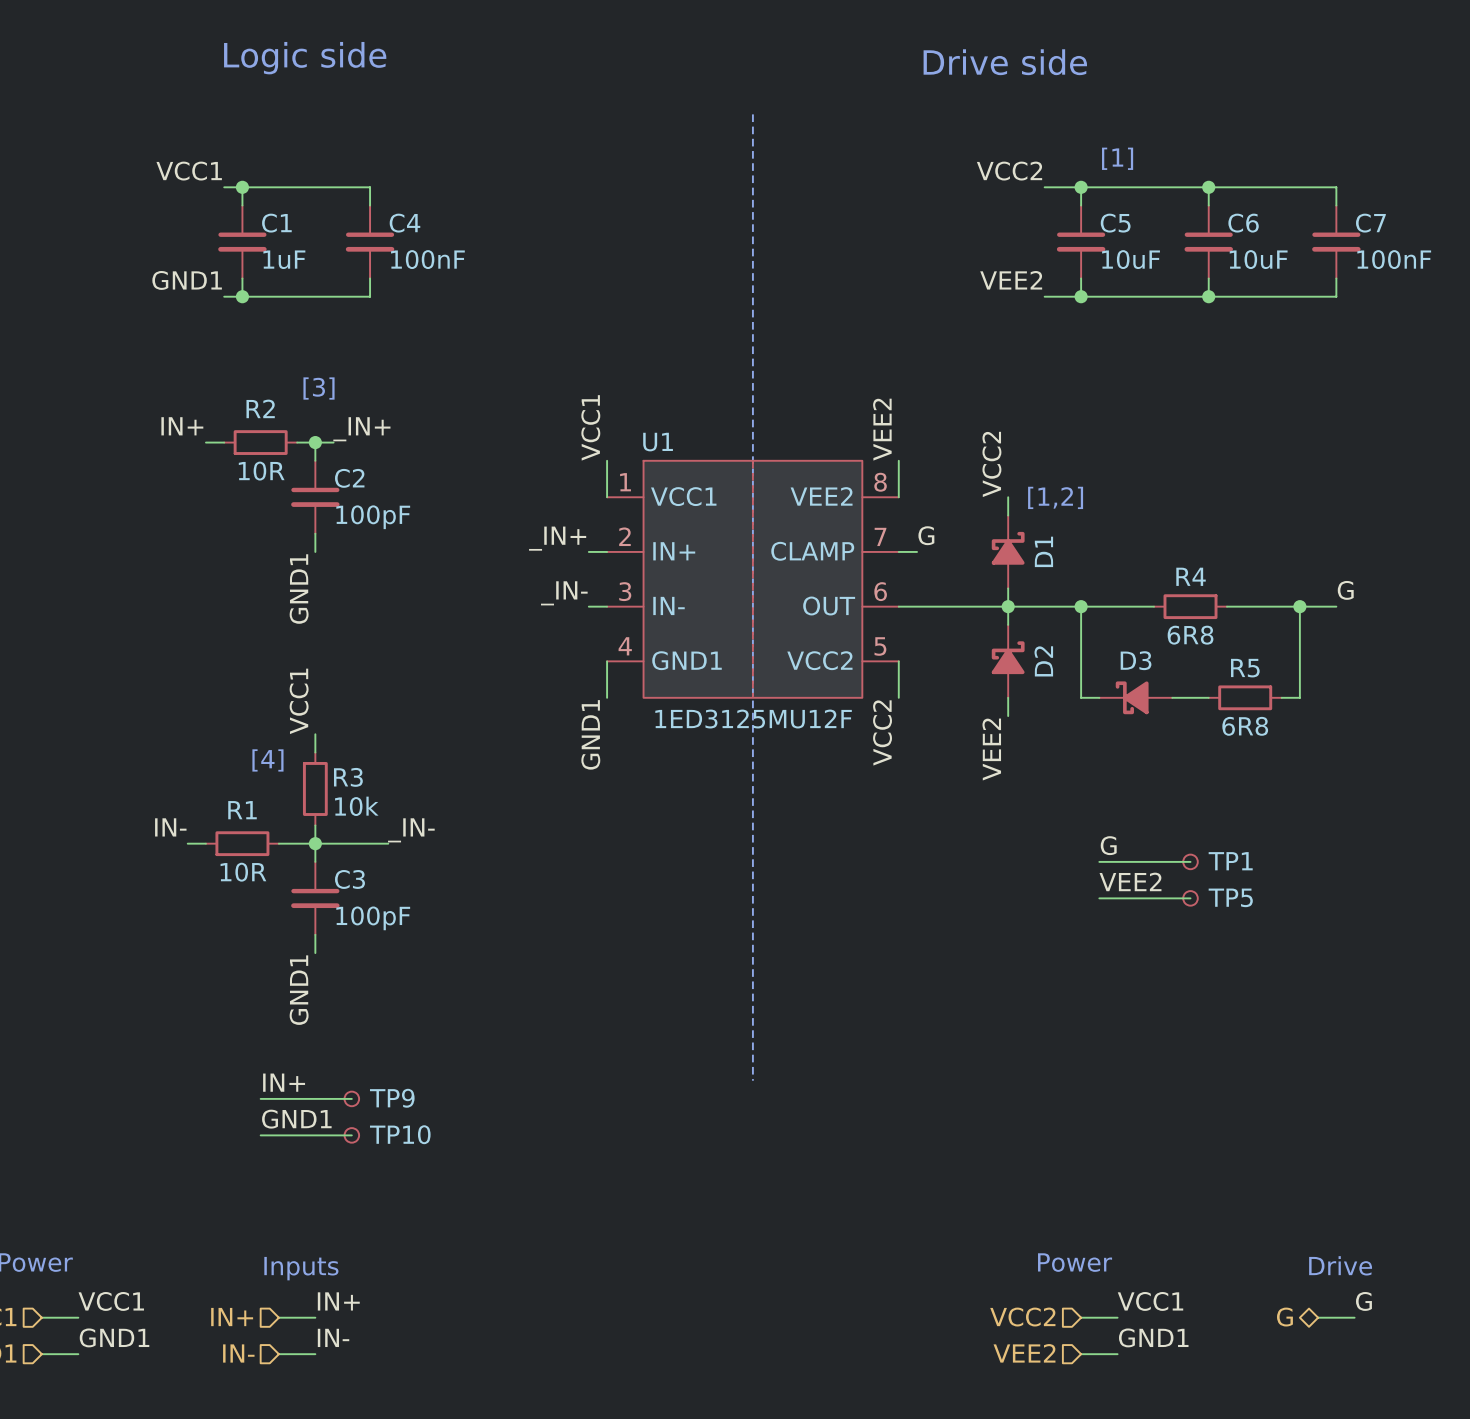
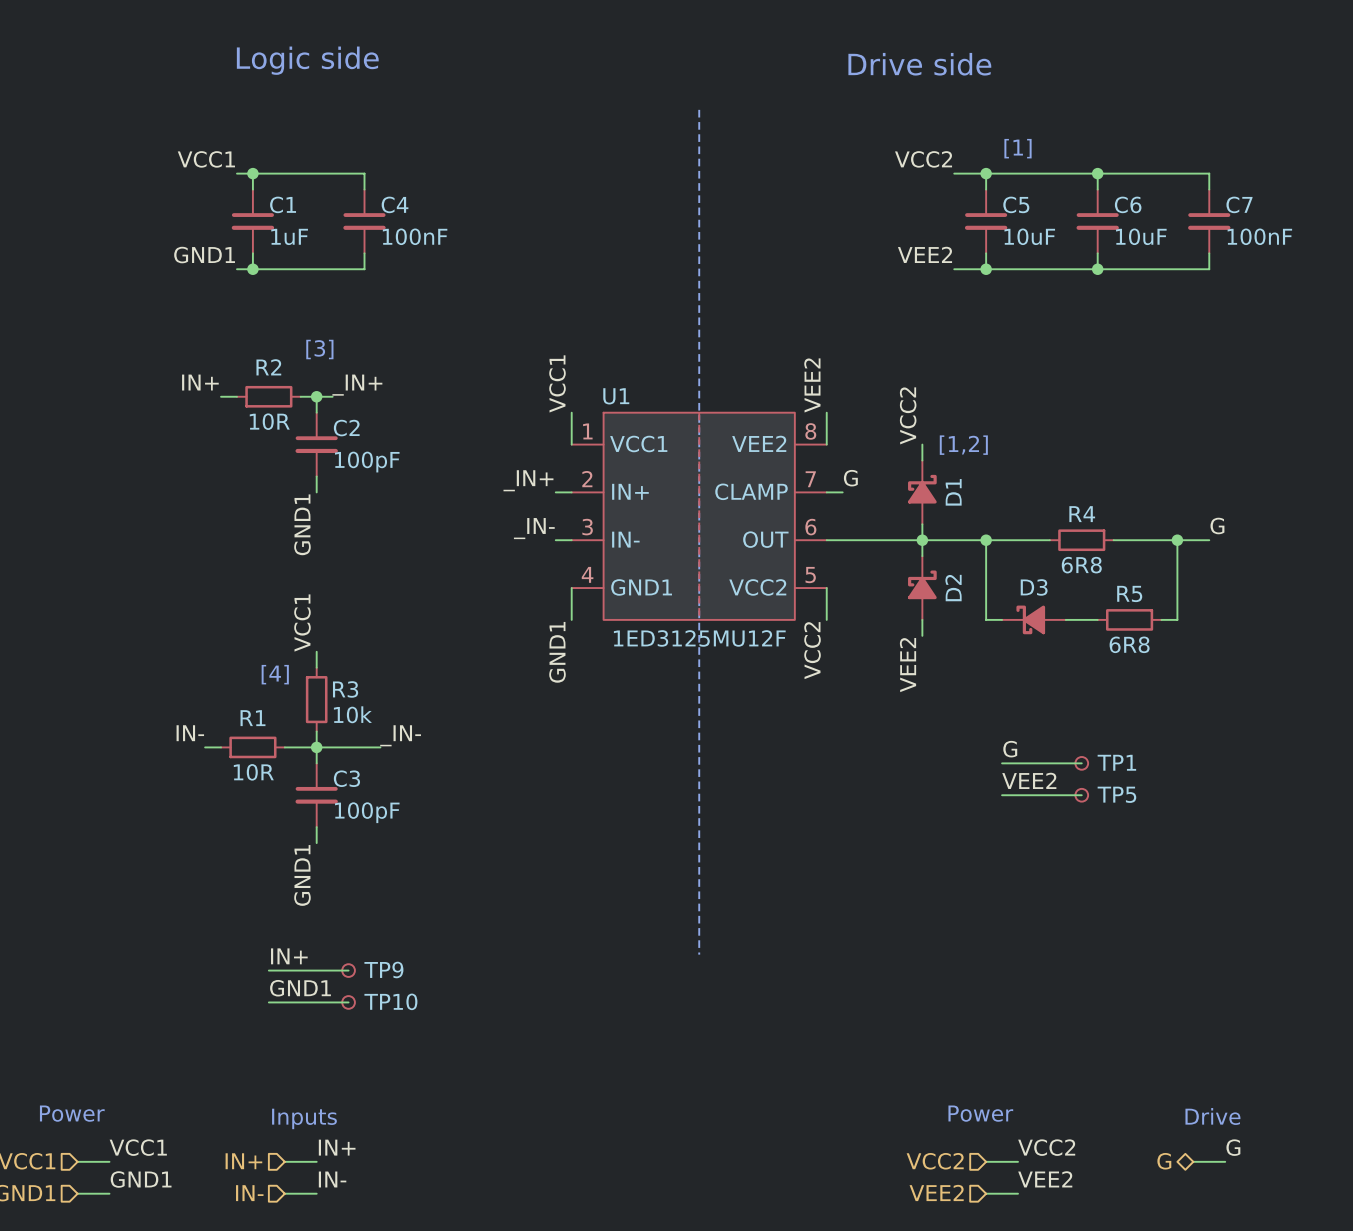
label: VCC1 (1150, 1301) -> VCC2 (1046, 1147)
label: GND1 (1153, 1337) -> VEE2 (1045, 1179)

